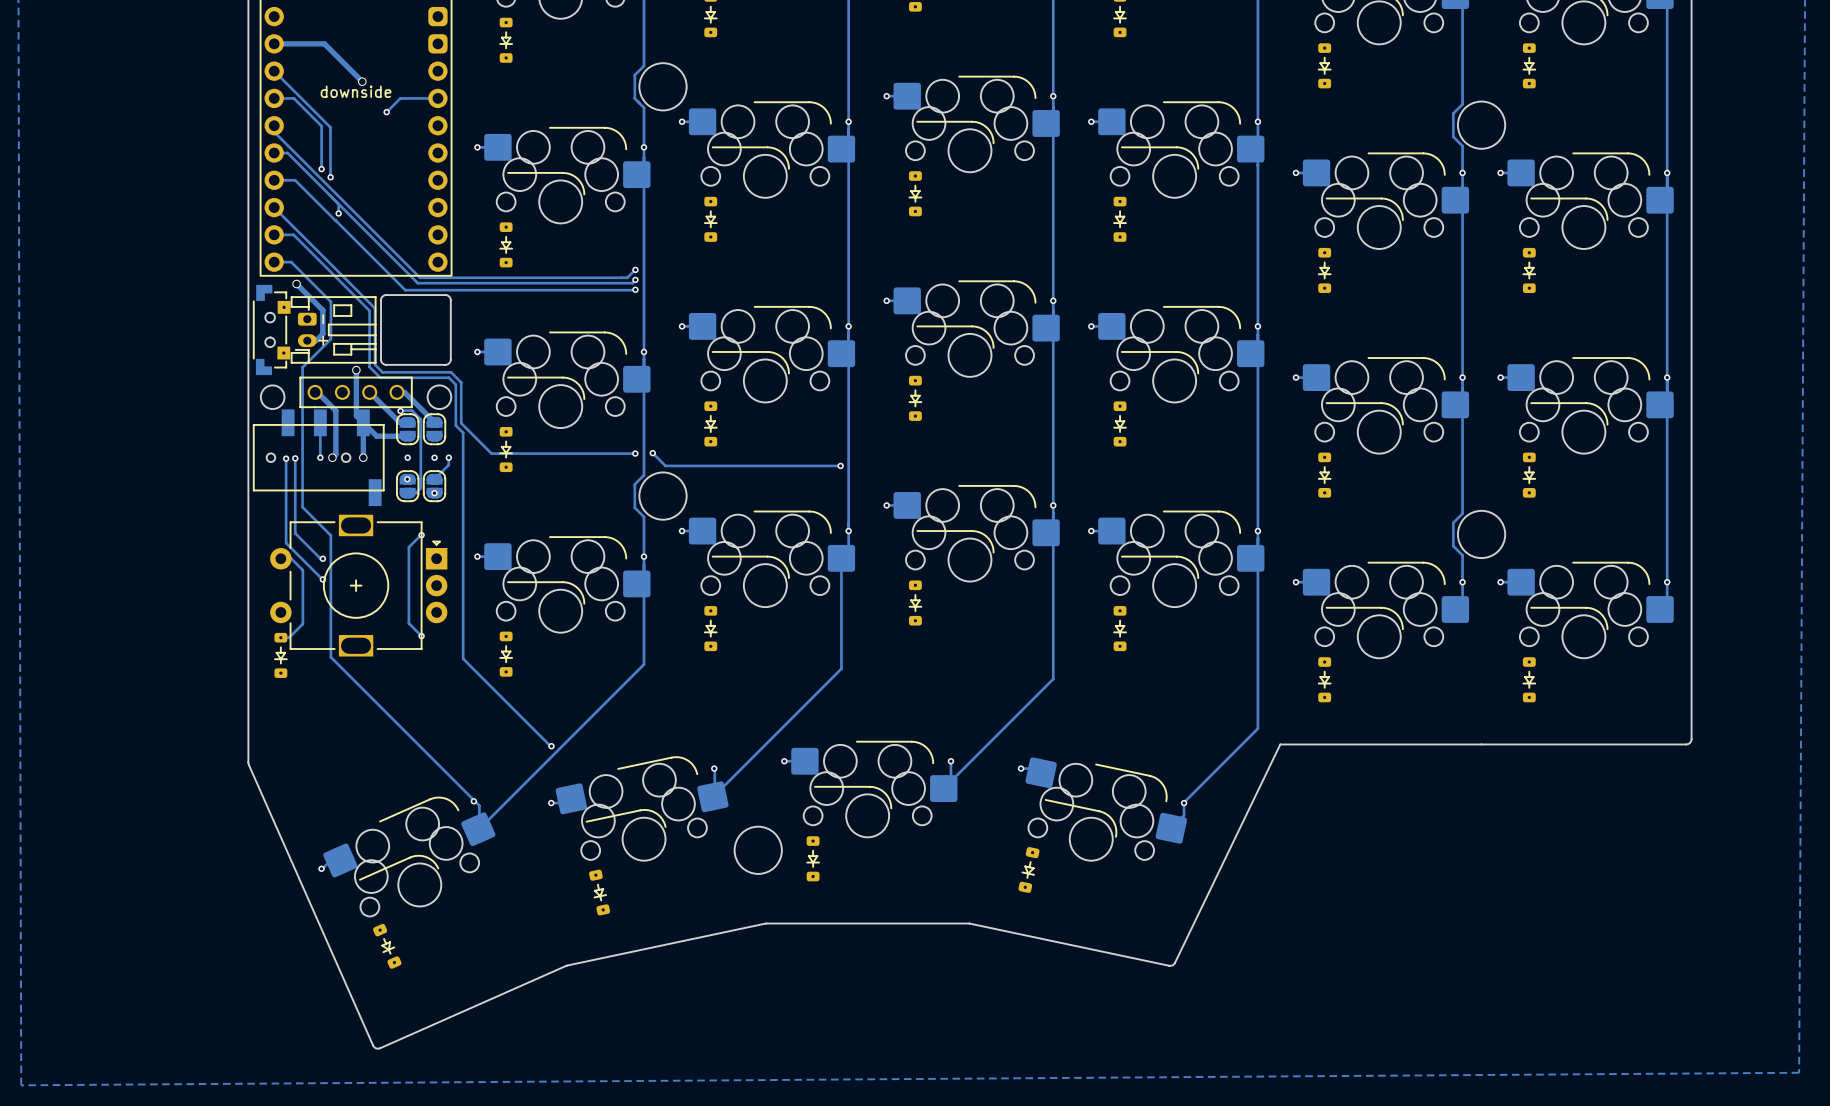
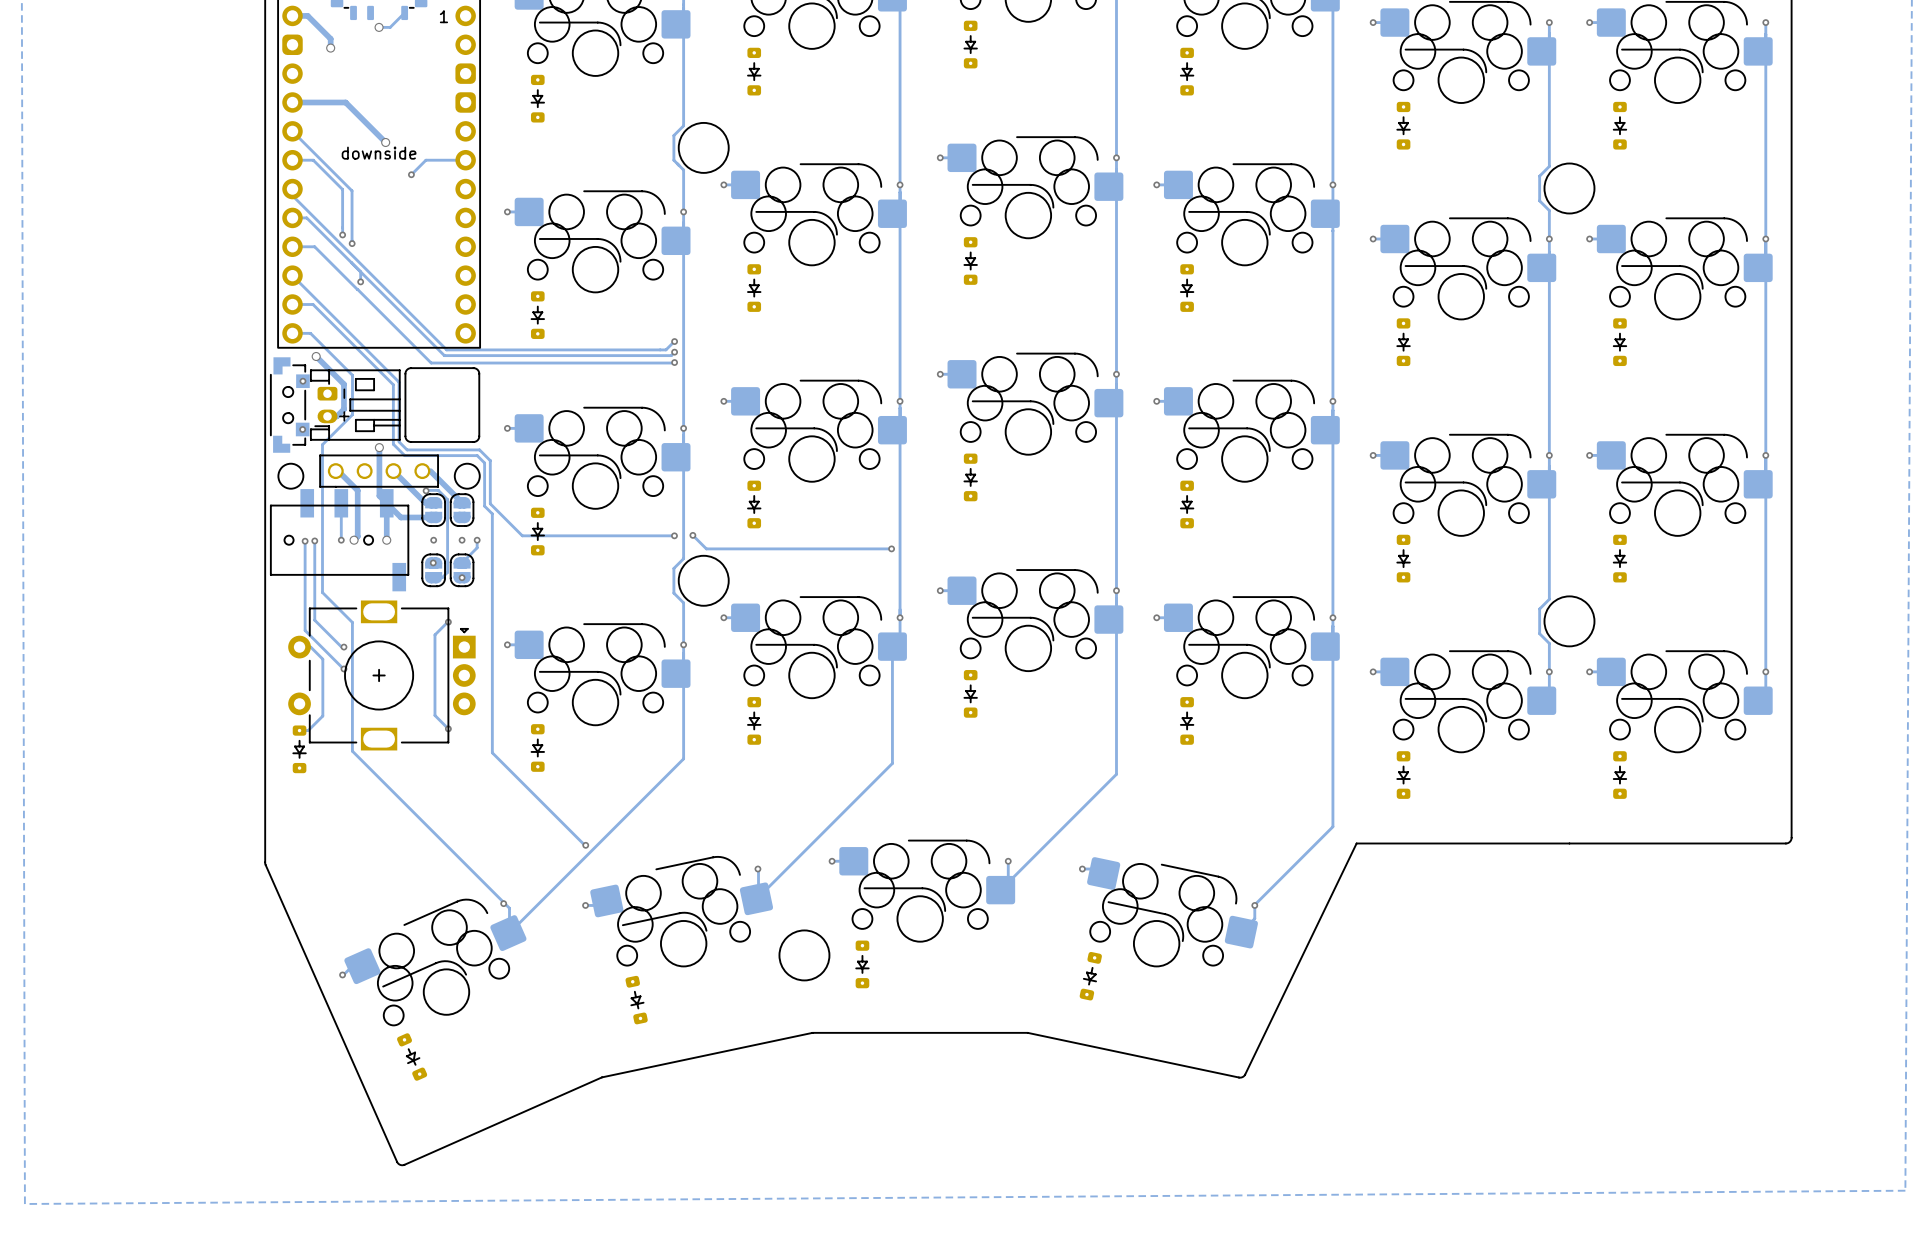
part footprint: [253, 284, 291, 376] -> [270, 357, 310, 453]
via: none -> (302, 381)
via: none -> (302, 429)

